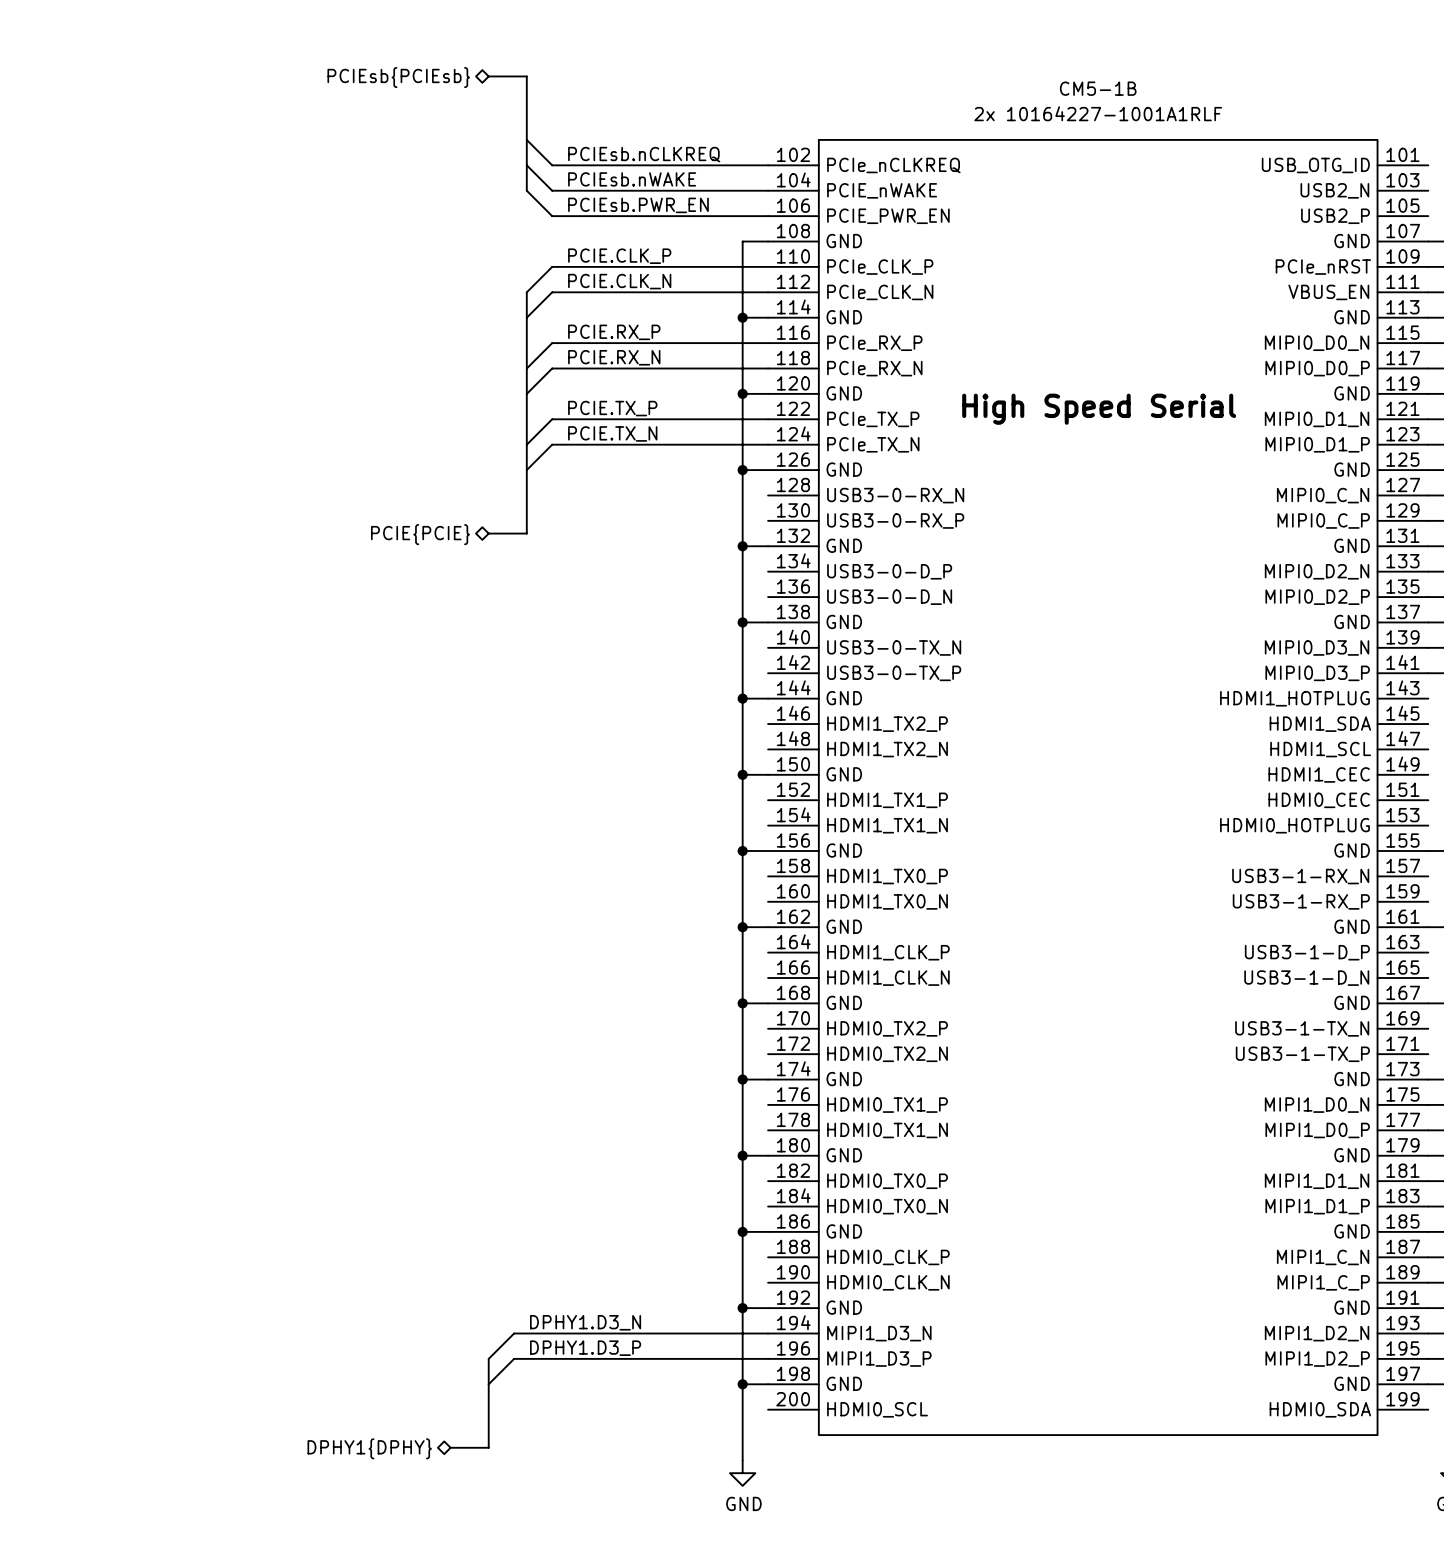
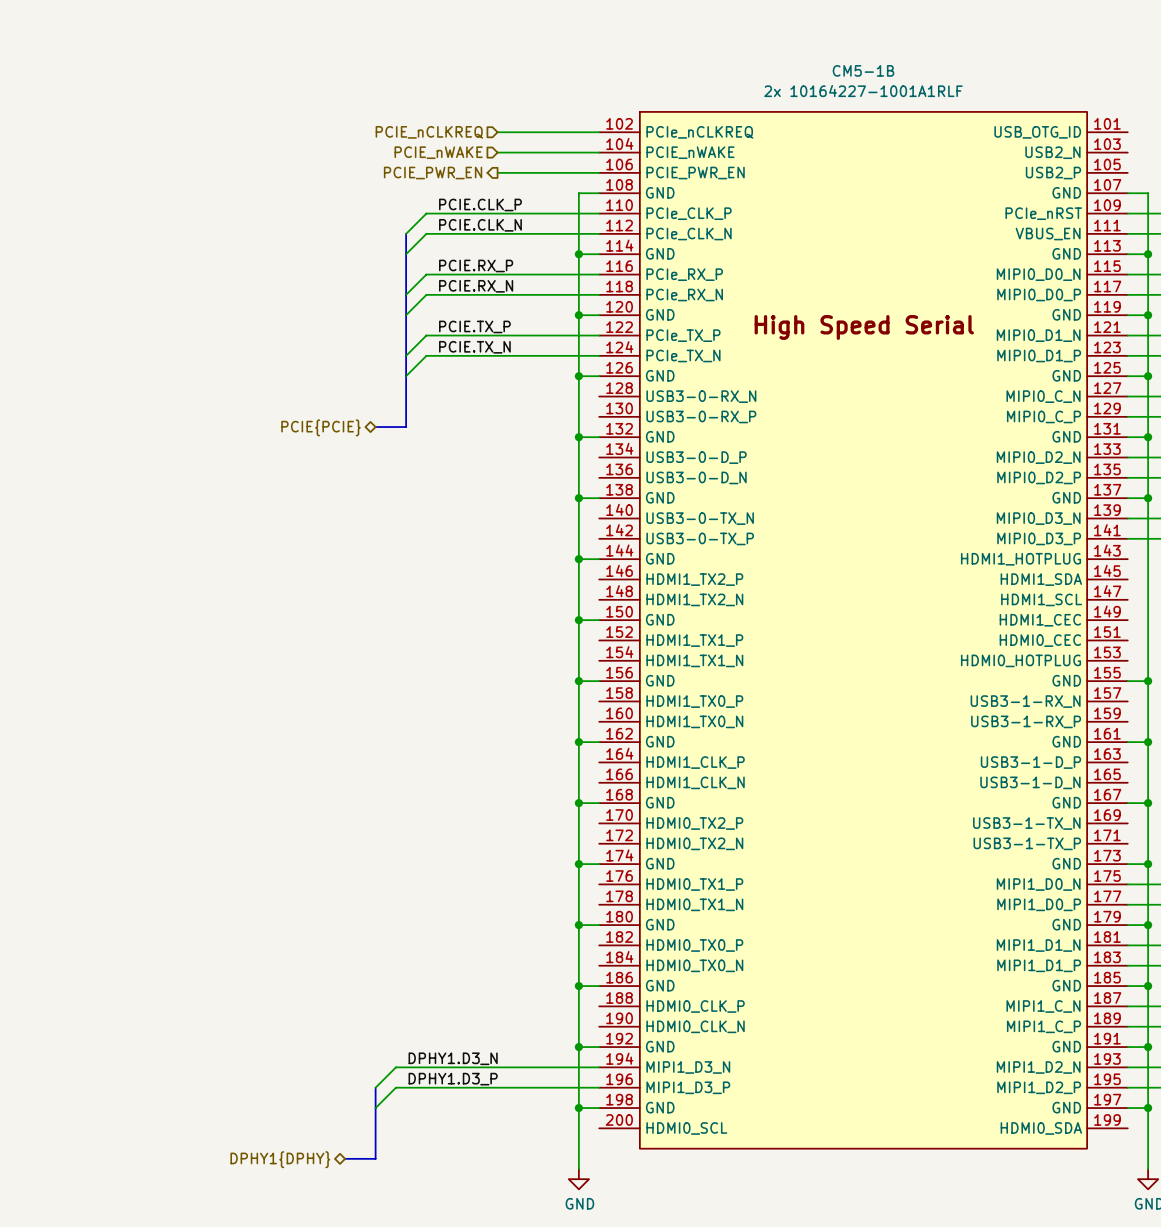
bus: (488, 76) (526, 76) (526, 190) -> none
hierarchical label: PCIEsb{PCIEsb} (398, 77) -> none
wire: (526, 139) (552, 165) (641, 165) -> none
label: PCIEsb.nCLKREQ (644, 154) -> none
wire: (526, 165) (552, 190) (641, 190) -> none
hierarchical label: none -> PCIE_nCLKREQ (429, 132)
label: PCIEsb.nWAKE (632, 179) -> none
wire: (526, 190) (552, 216) (641, 216) -> none
hierarchical label: none -> PCIE_nWAKE (438, 152)
label: PCIEsb.PWR_EN (638, 205) -> none
hierarchical label: none -> PCIE_PWR_EN (433, 173)

